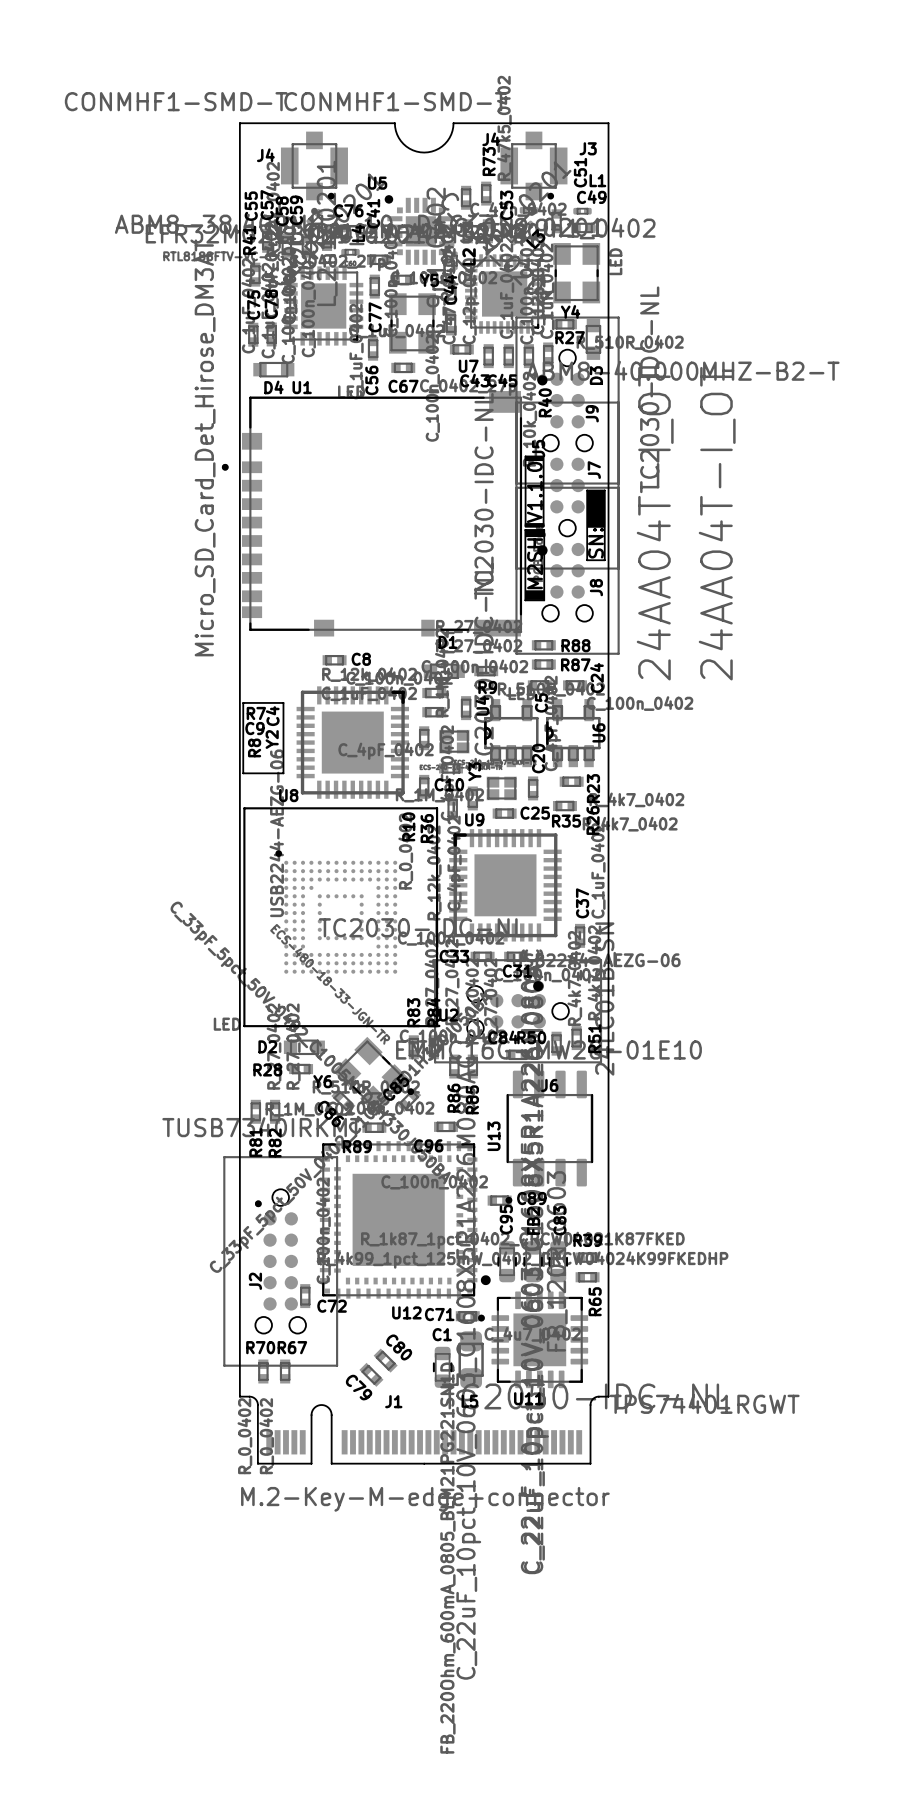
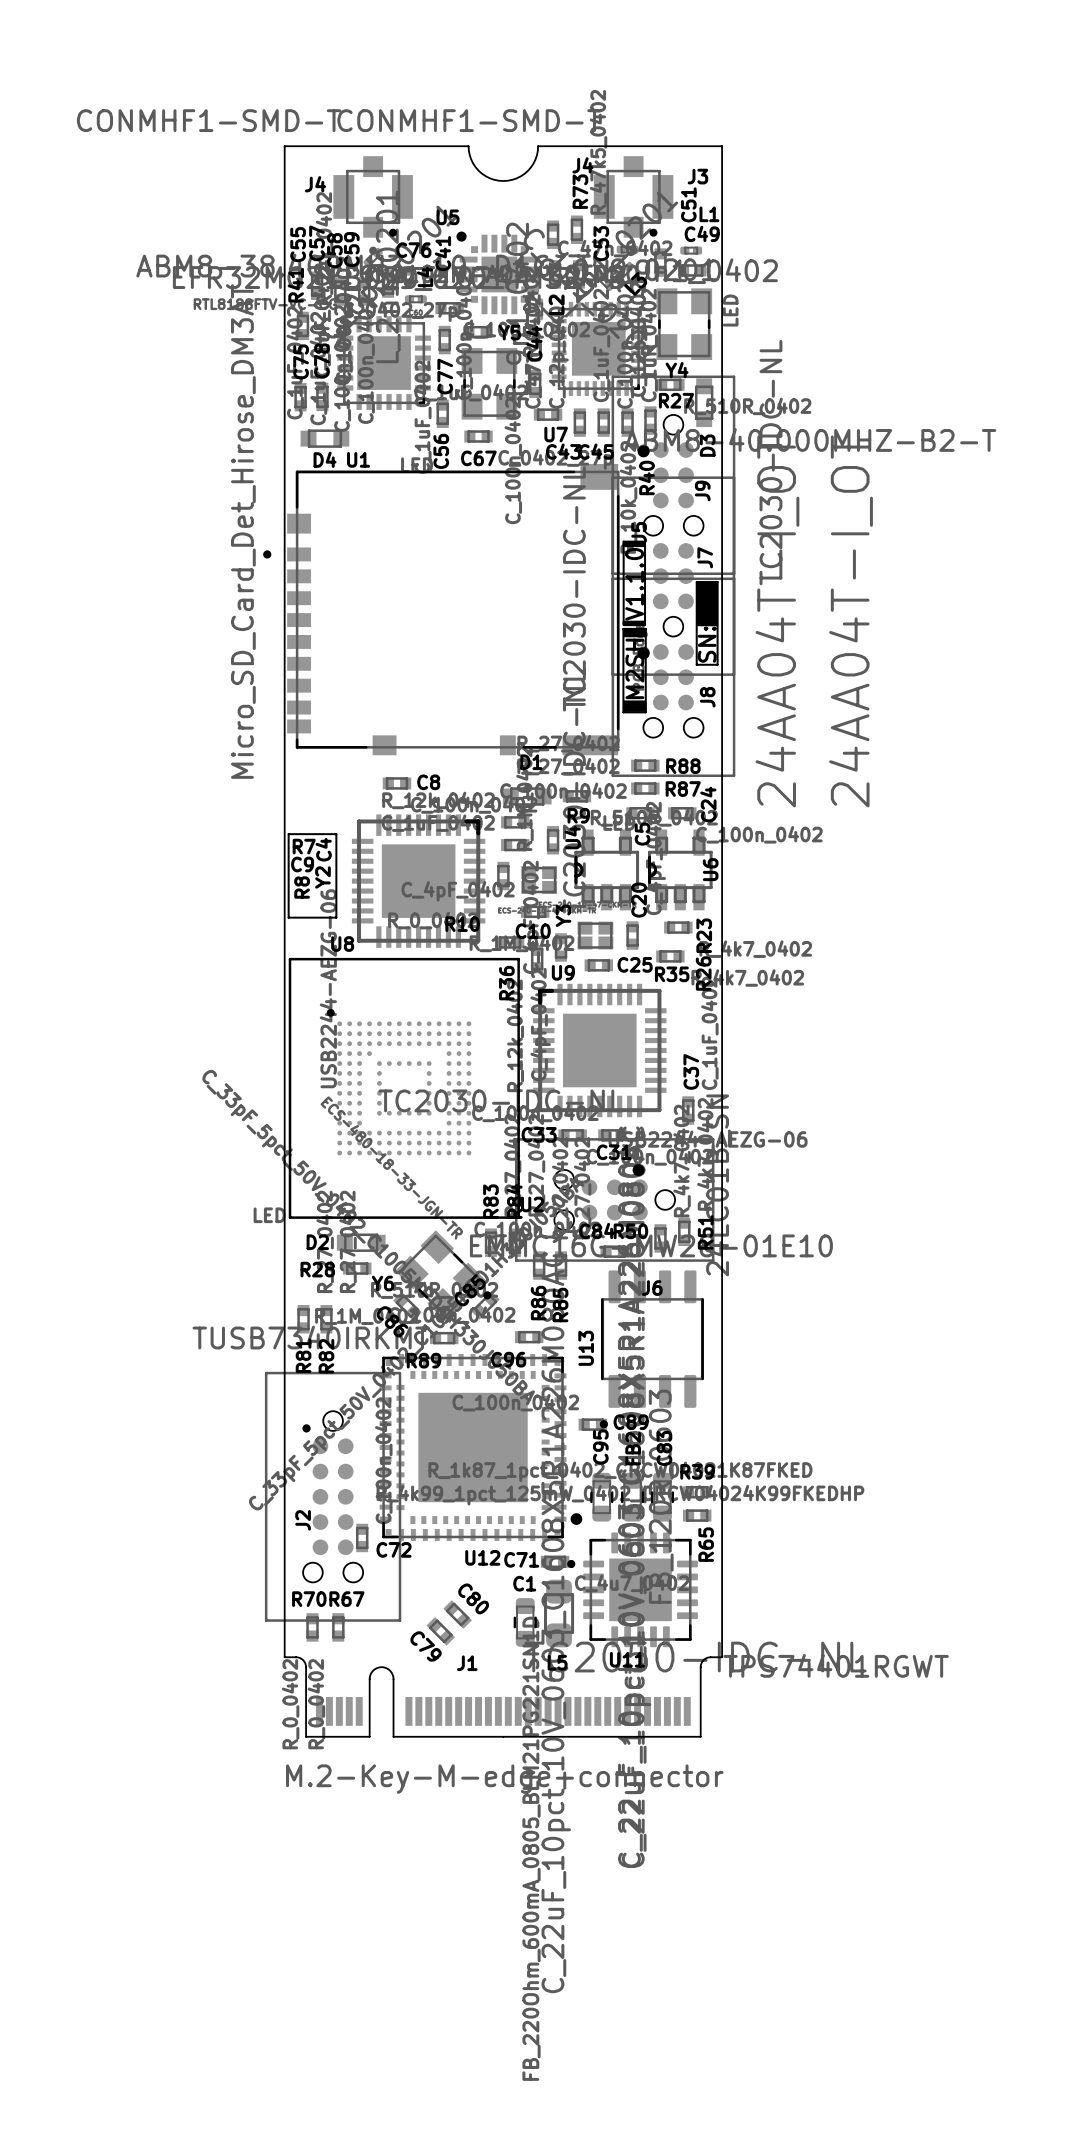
R10 rotation: 0° (424, 786) -> 90° clockwise (510, 942)

